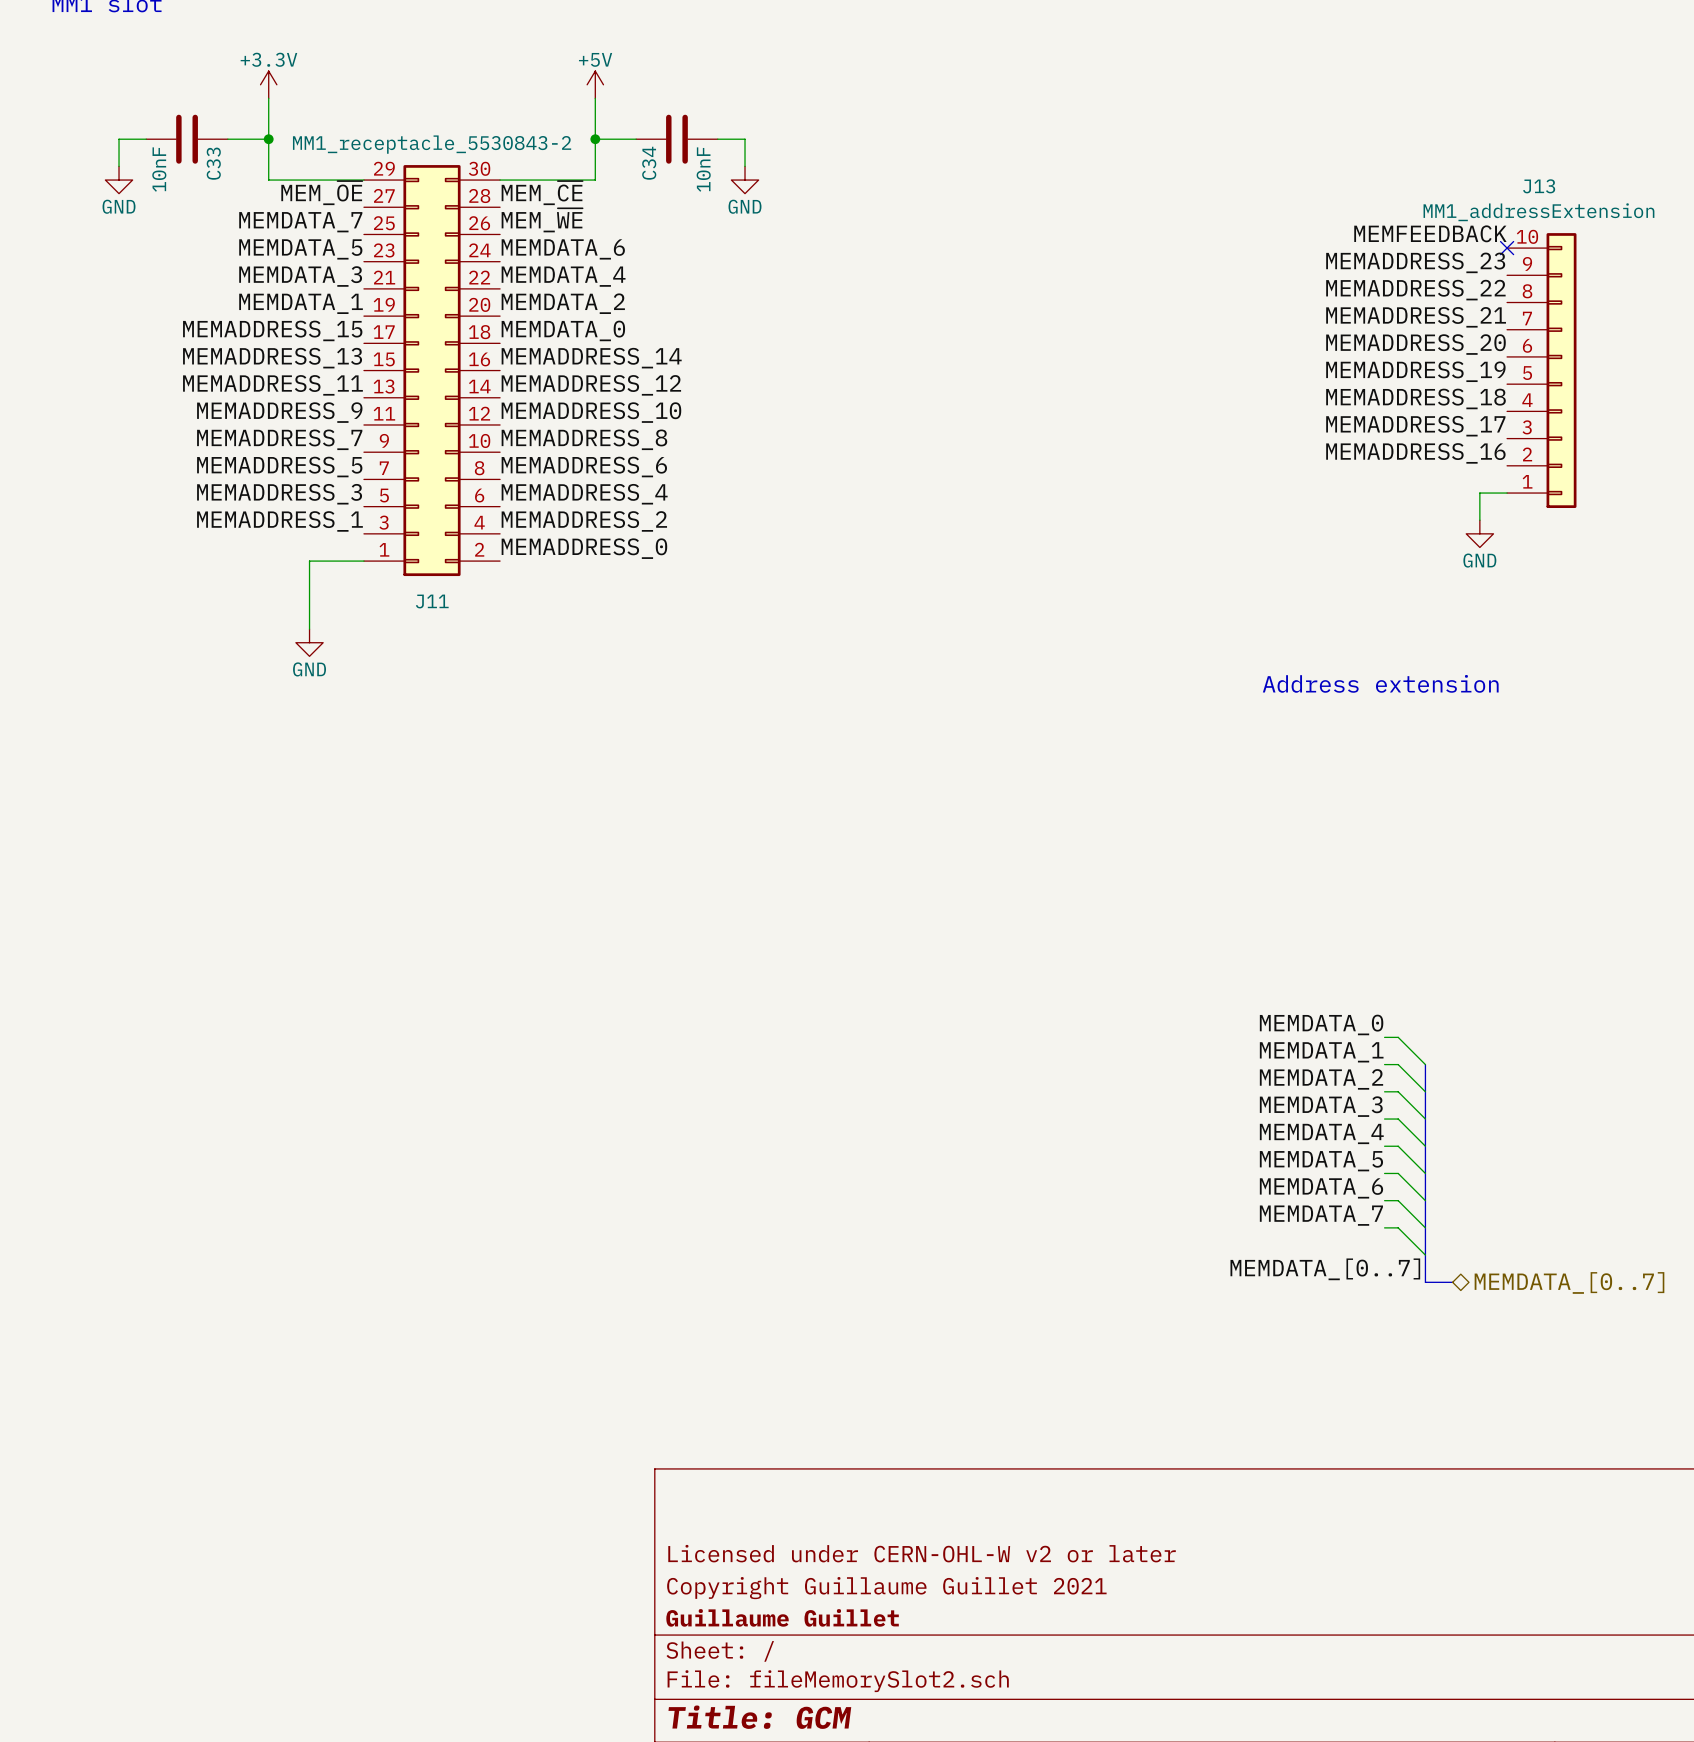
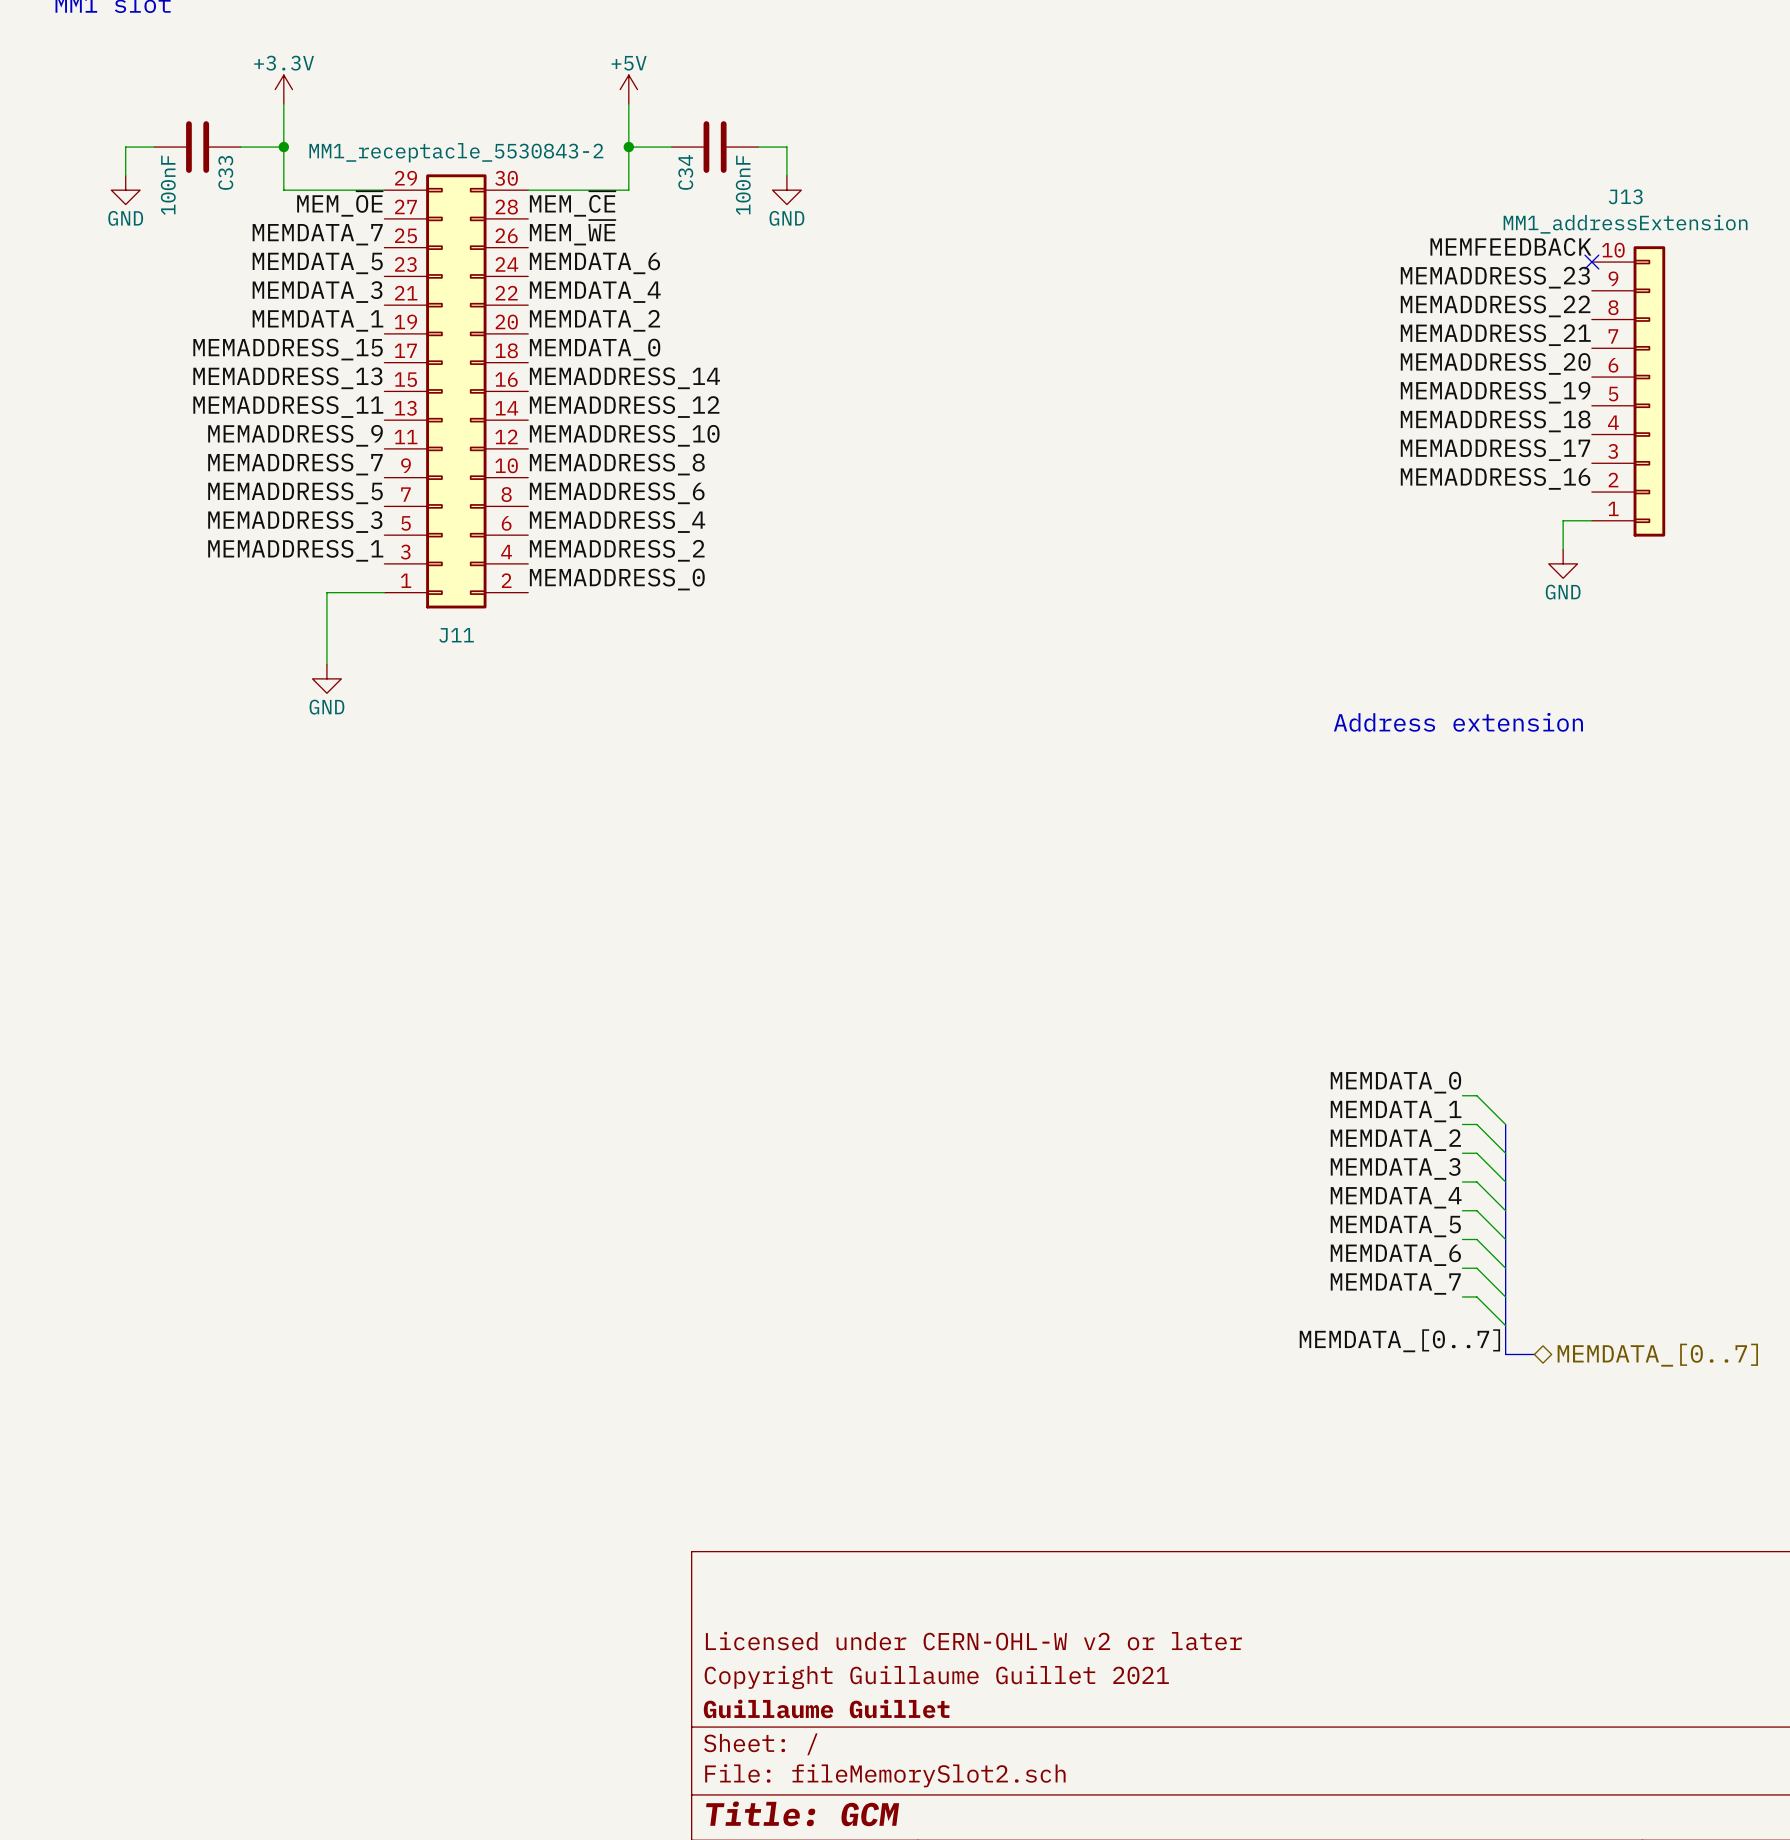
C33 value: 10nF (159, 169) -> 100nF (168, 185)
C34 value: 10nF (703, 169) -> 100nF (743, 185)

